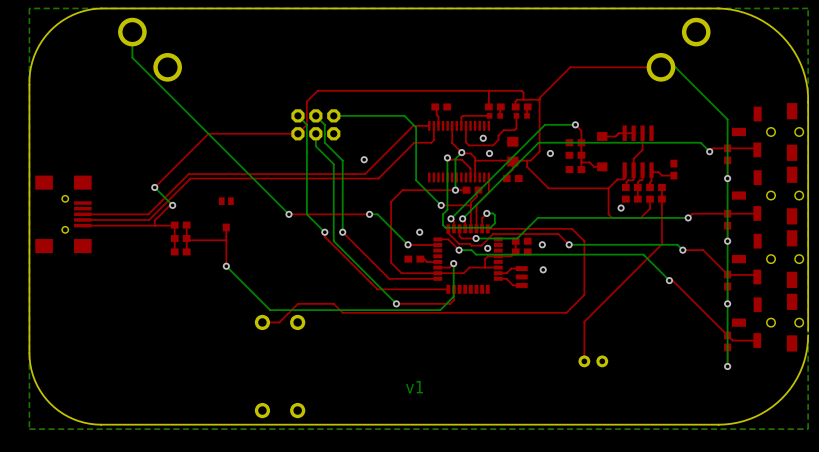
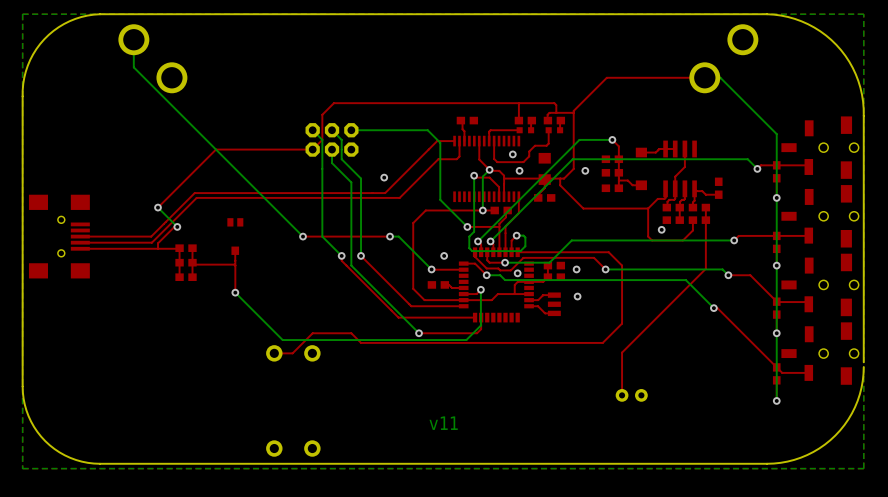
text: v1 (414, 387) -> v11 (443, 423)

